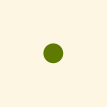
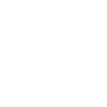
junction: (53, 53) -> none

